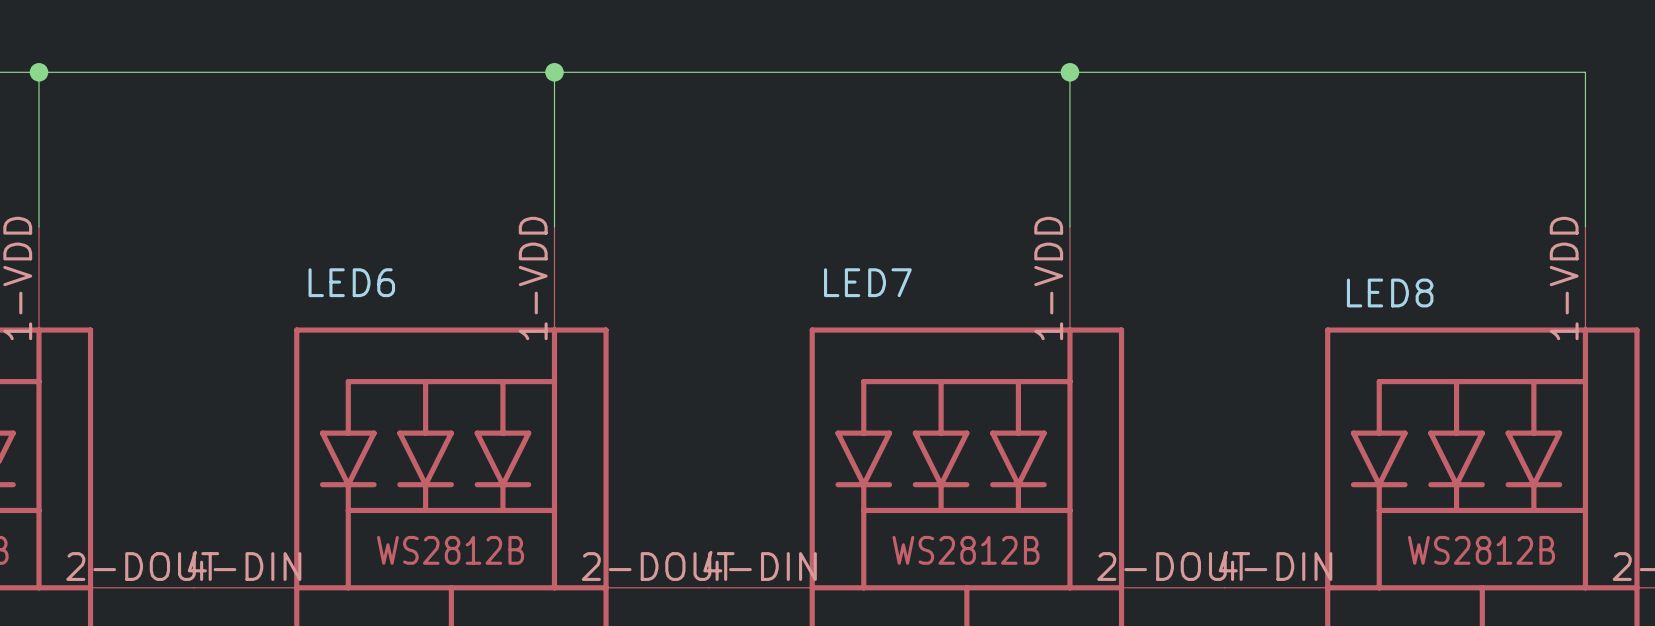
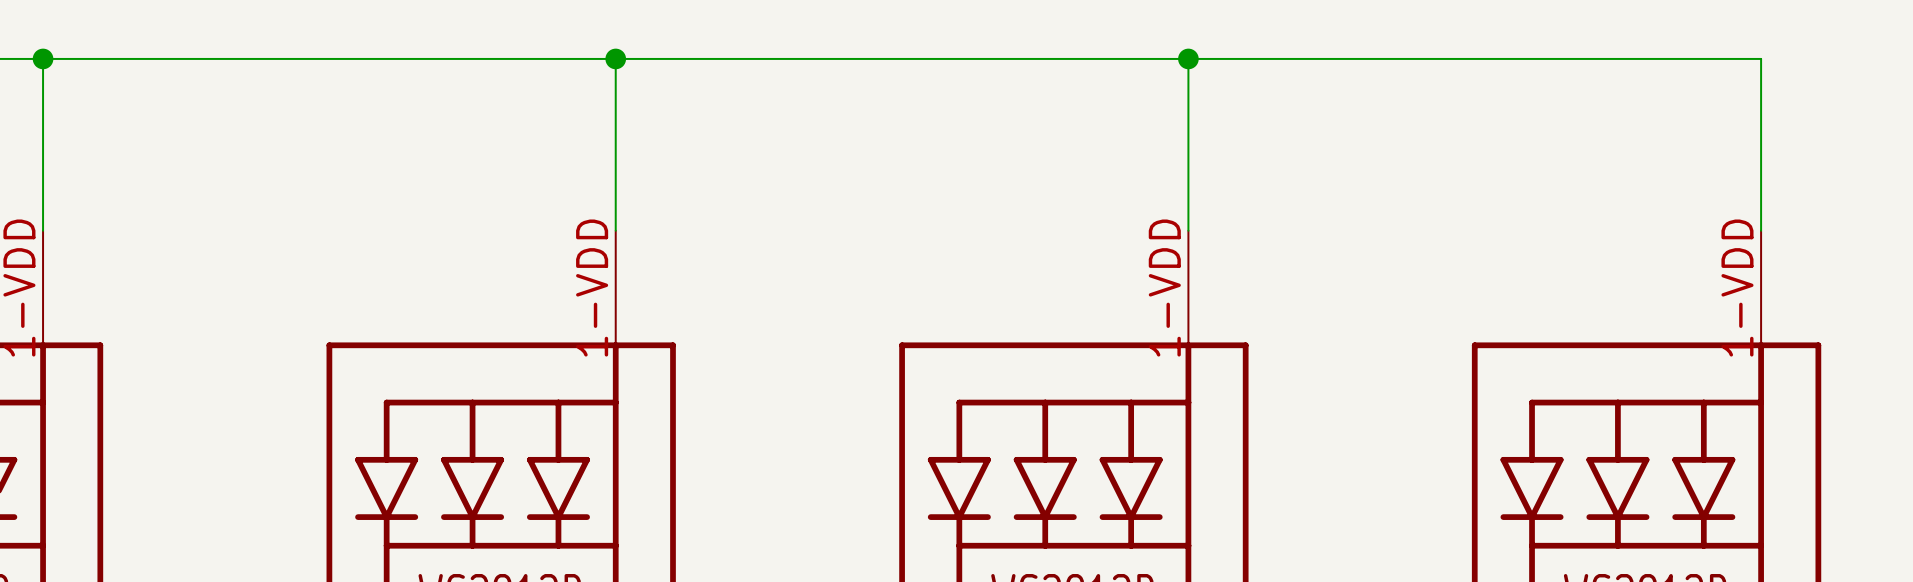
LED6 name: LED6 (351, 282) -> none
LED7 name: LED7 (867, 282) -> none
LED8 name: LED8 (1390, 292) -> none

